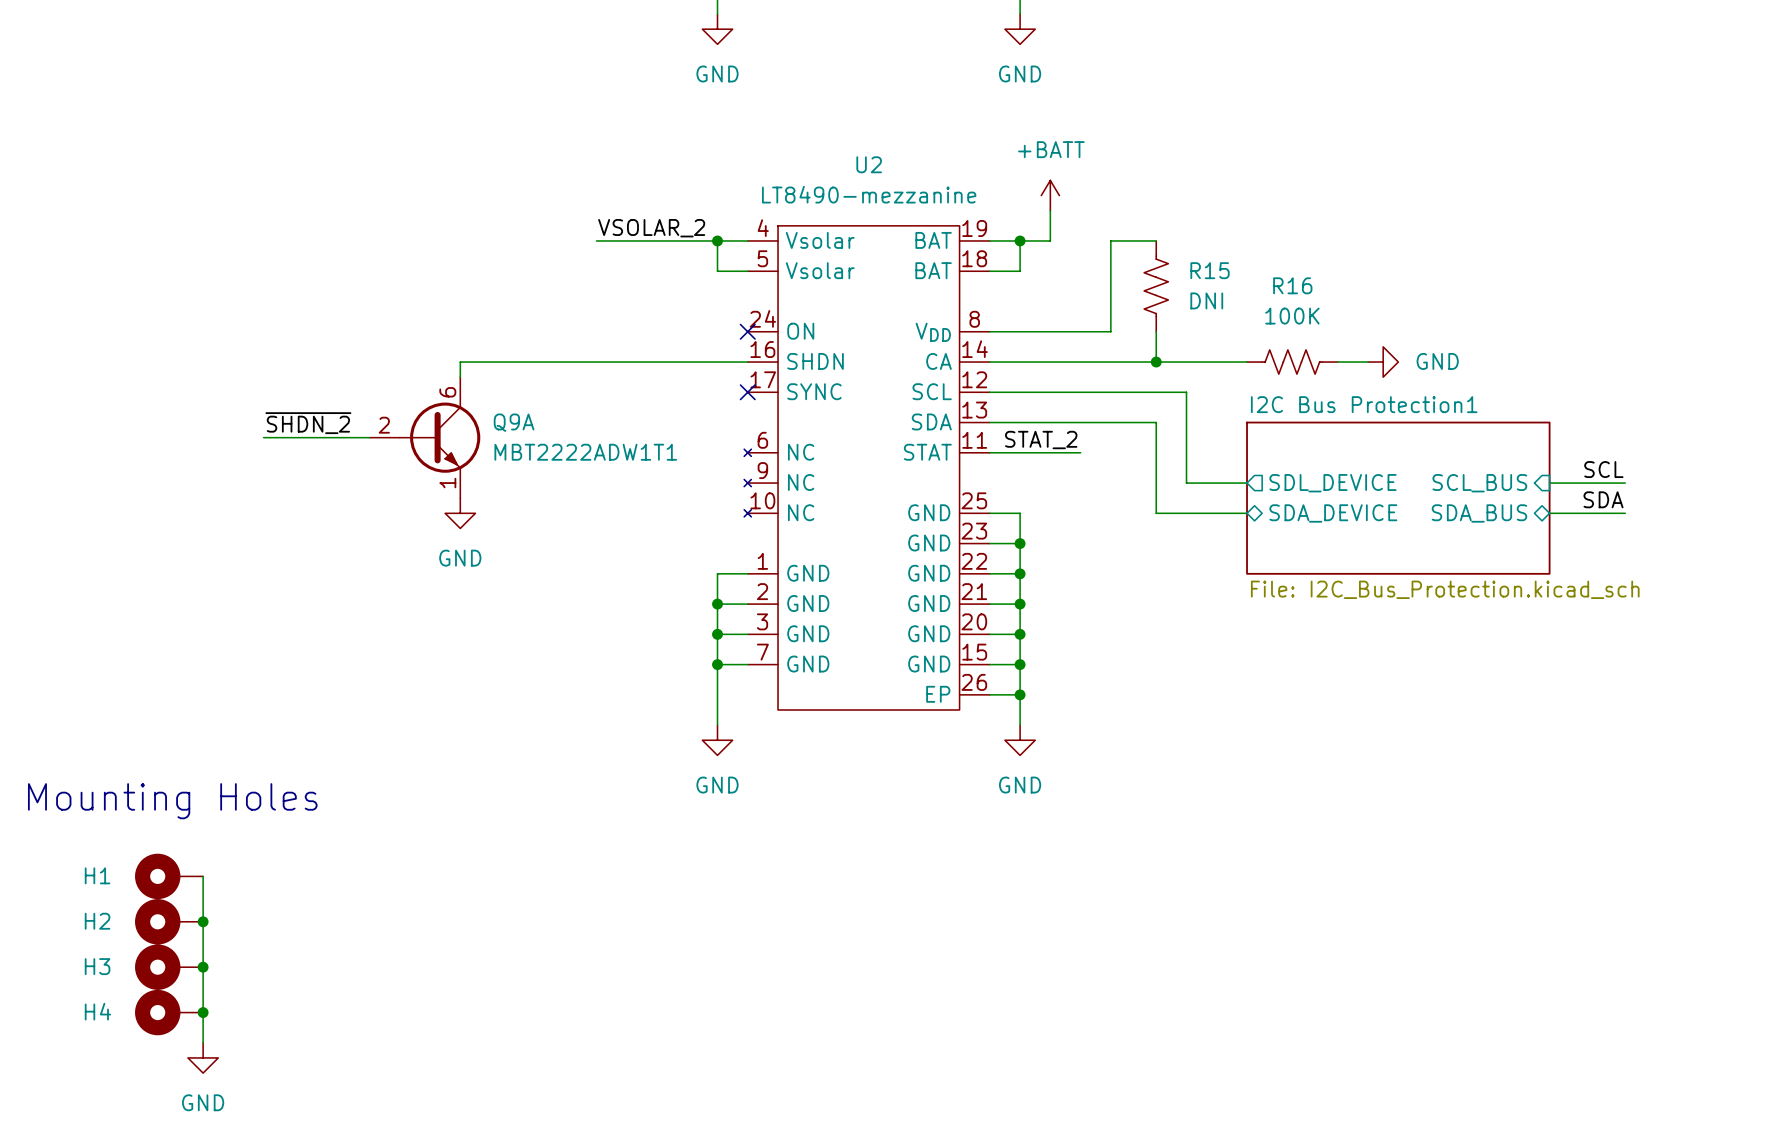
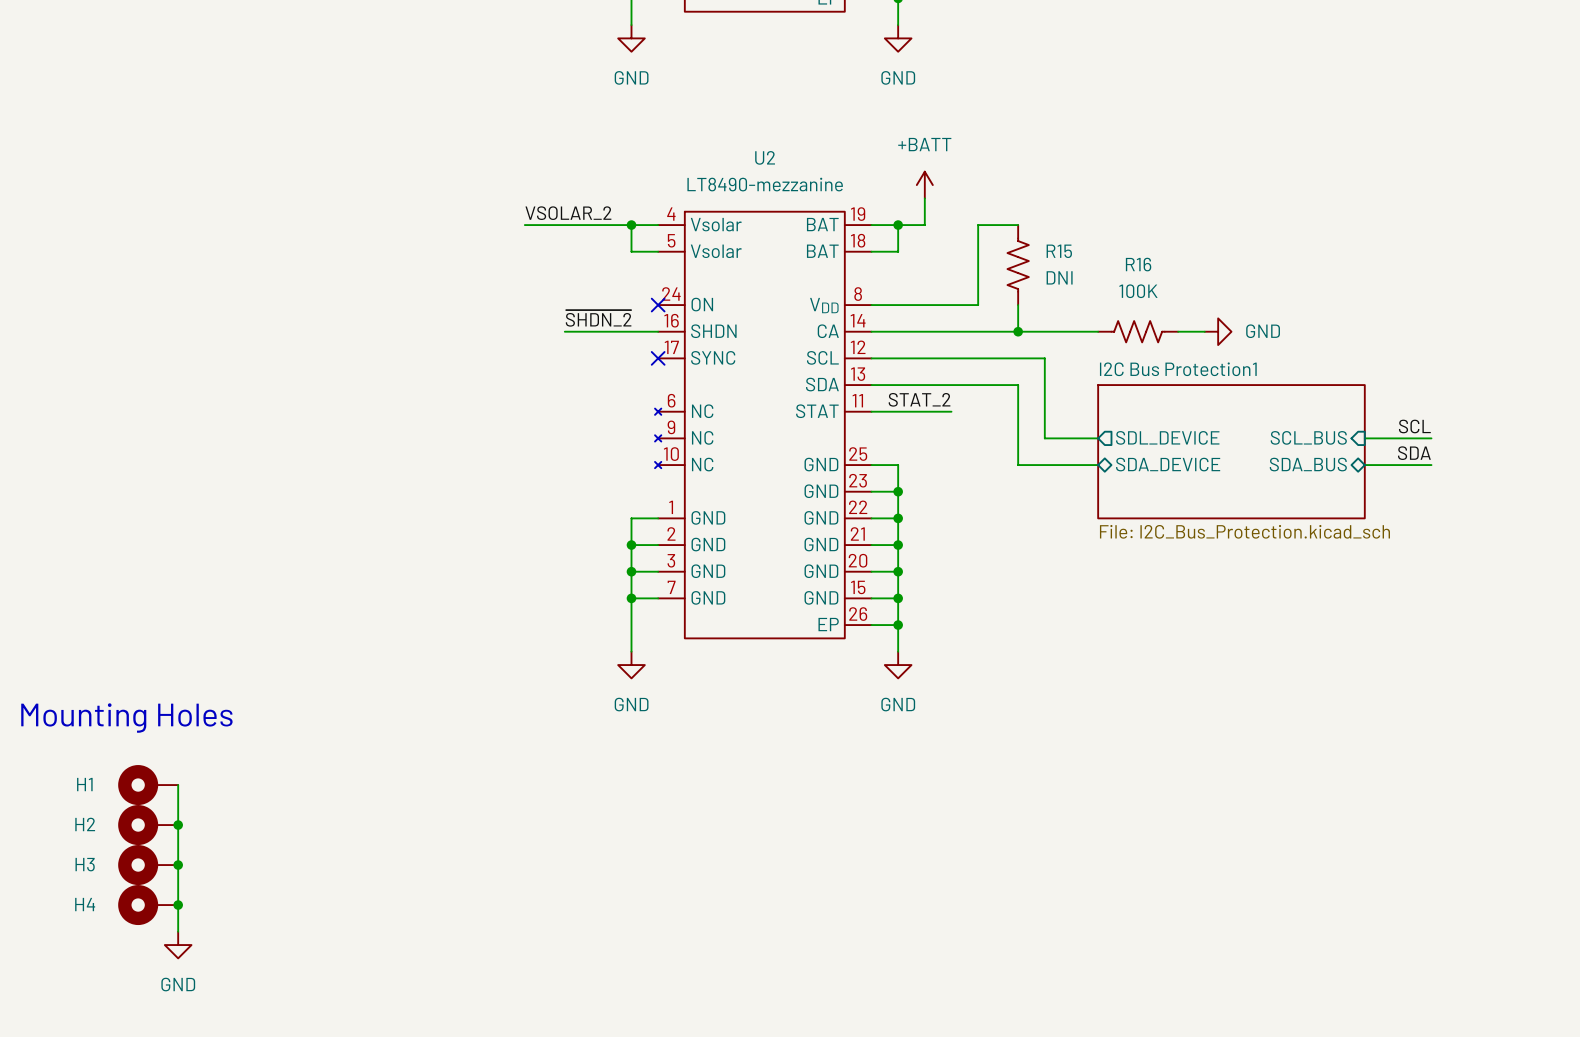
label: none -> ~{SHDN_2} (598, 318)
wire: (641, 362) (460, 362) (460, 377) -> none
label: ~{SHDN_2} (308, 423) -> none
wire: (263, 437) (369, 437) -> none
Q9A: MBT2222ADW1T1 (424, 437) -> none
power symbol: GND (460, 513) -> none

